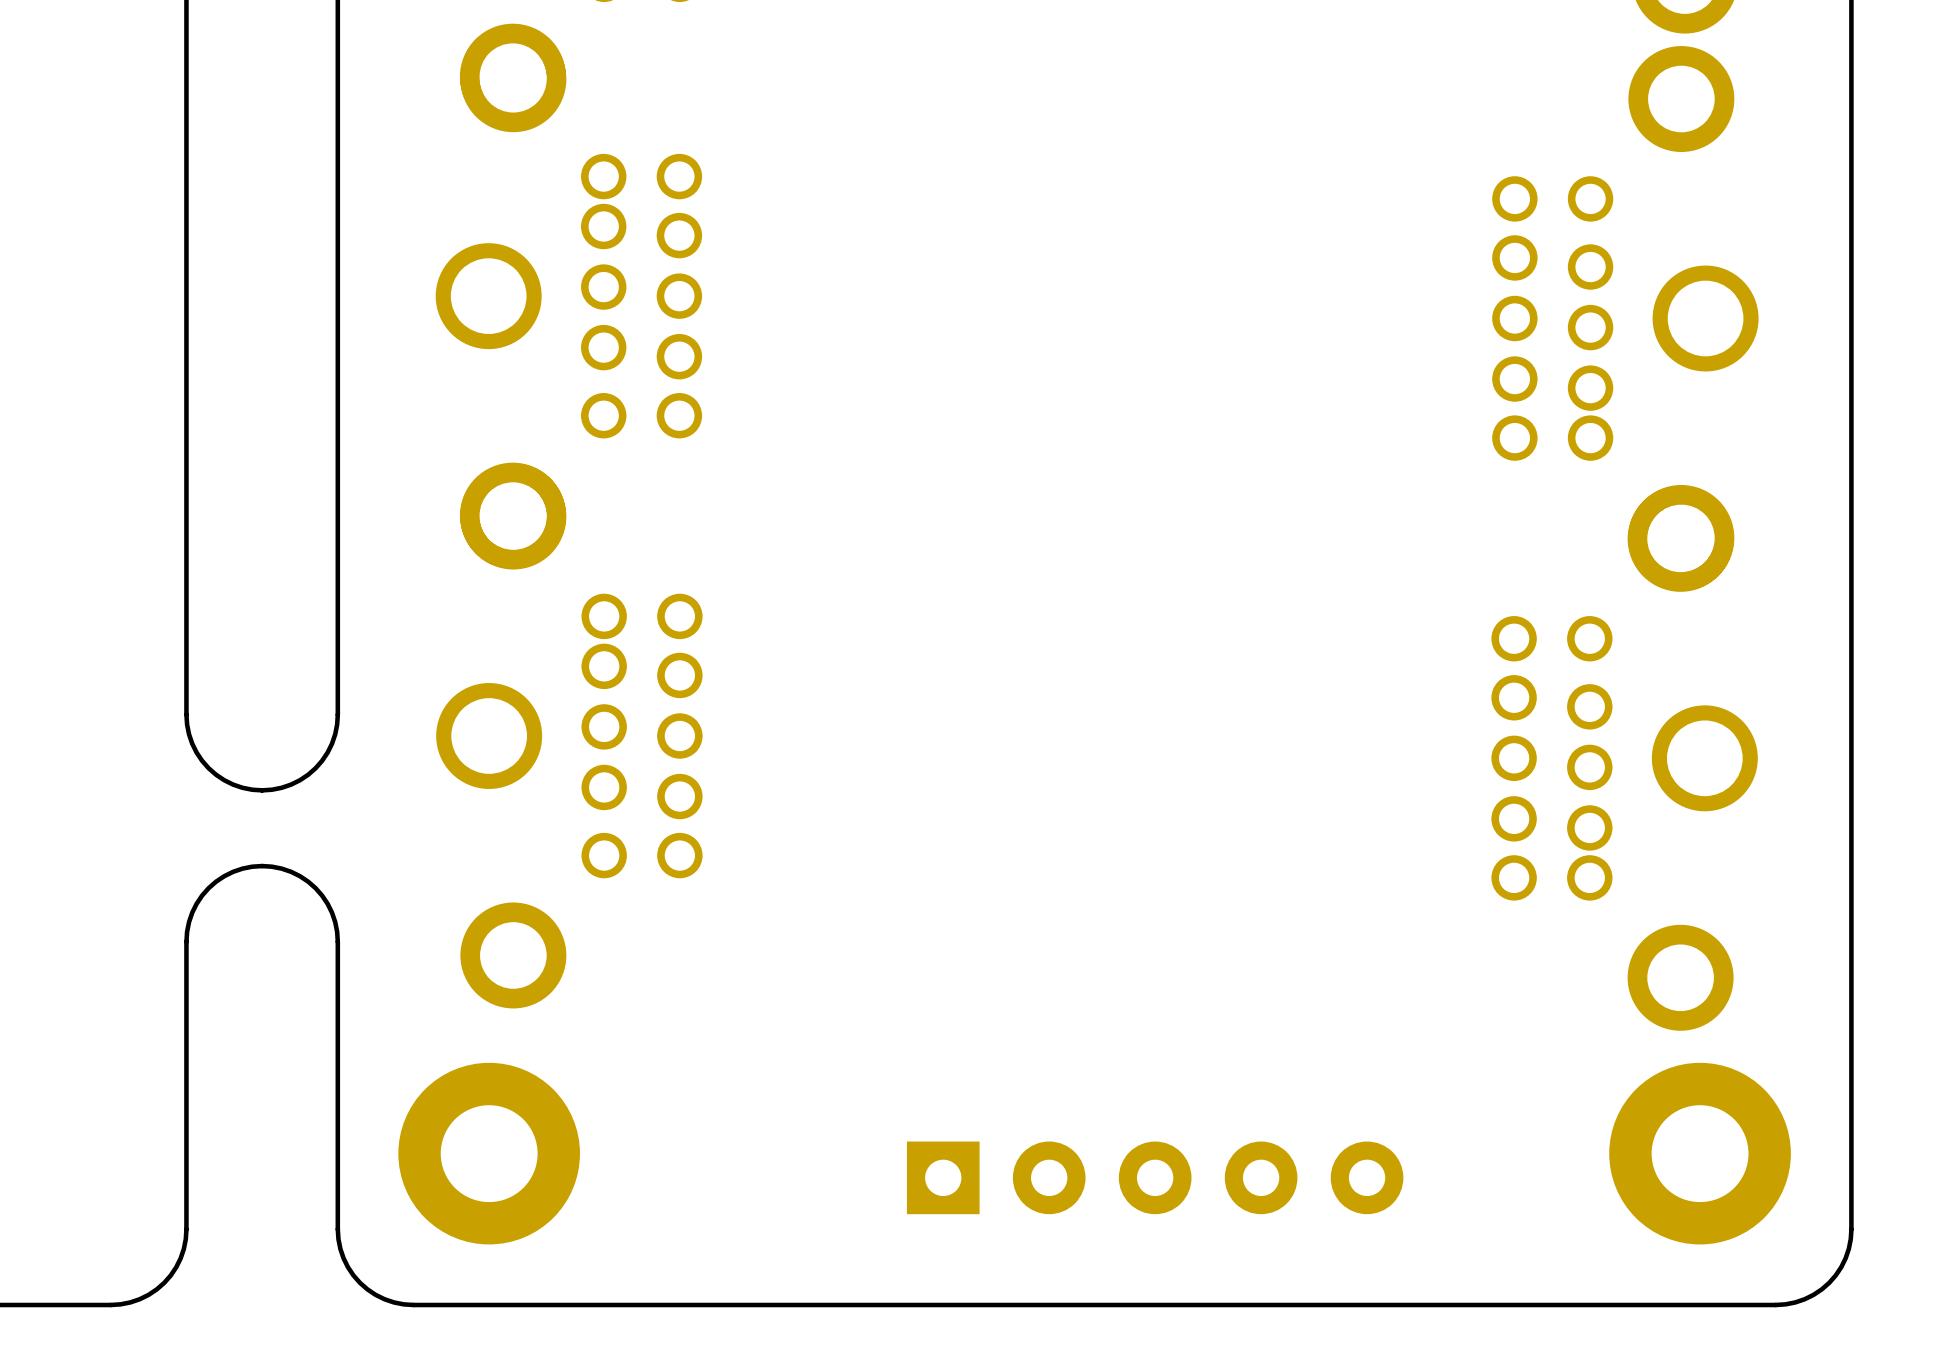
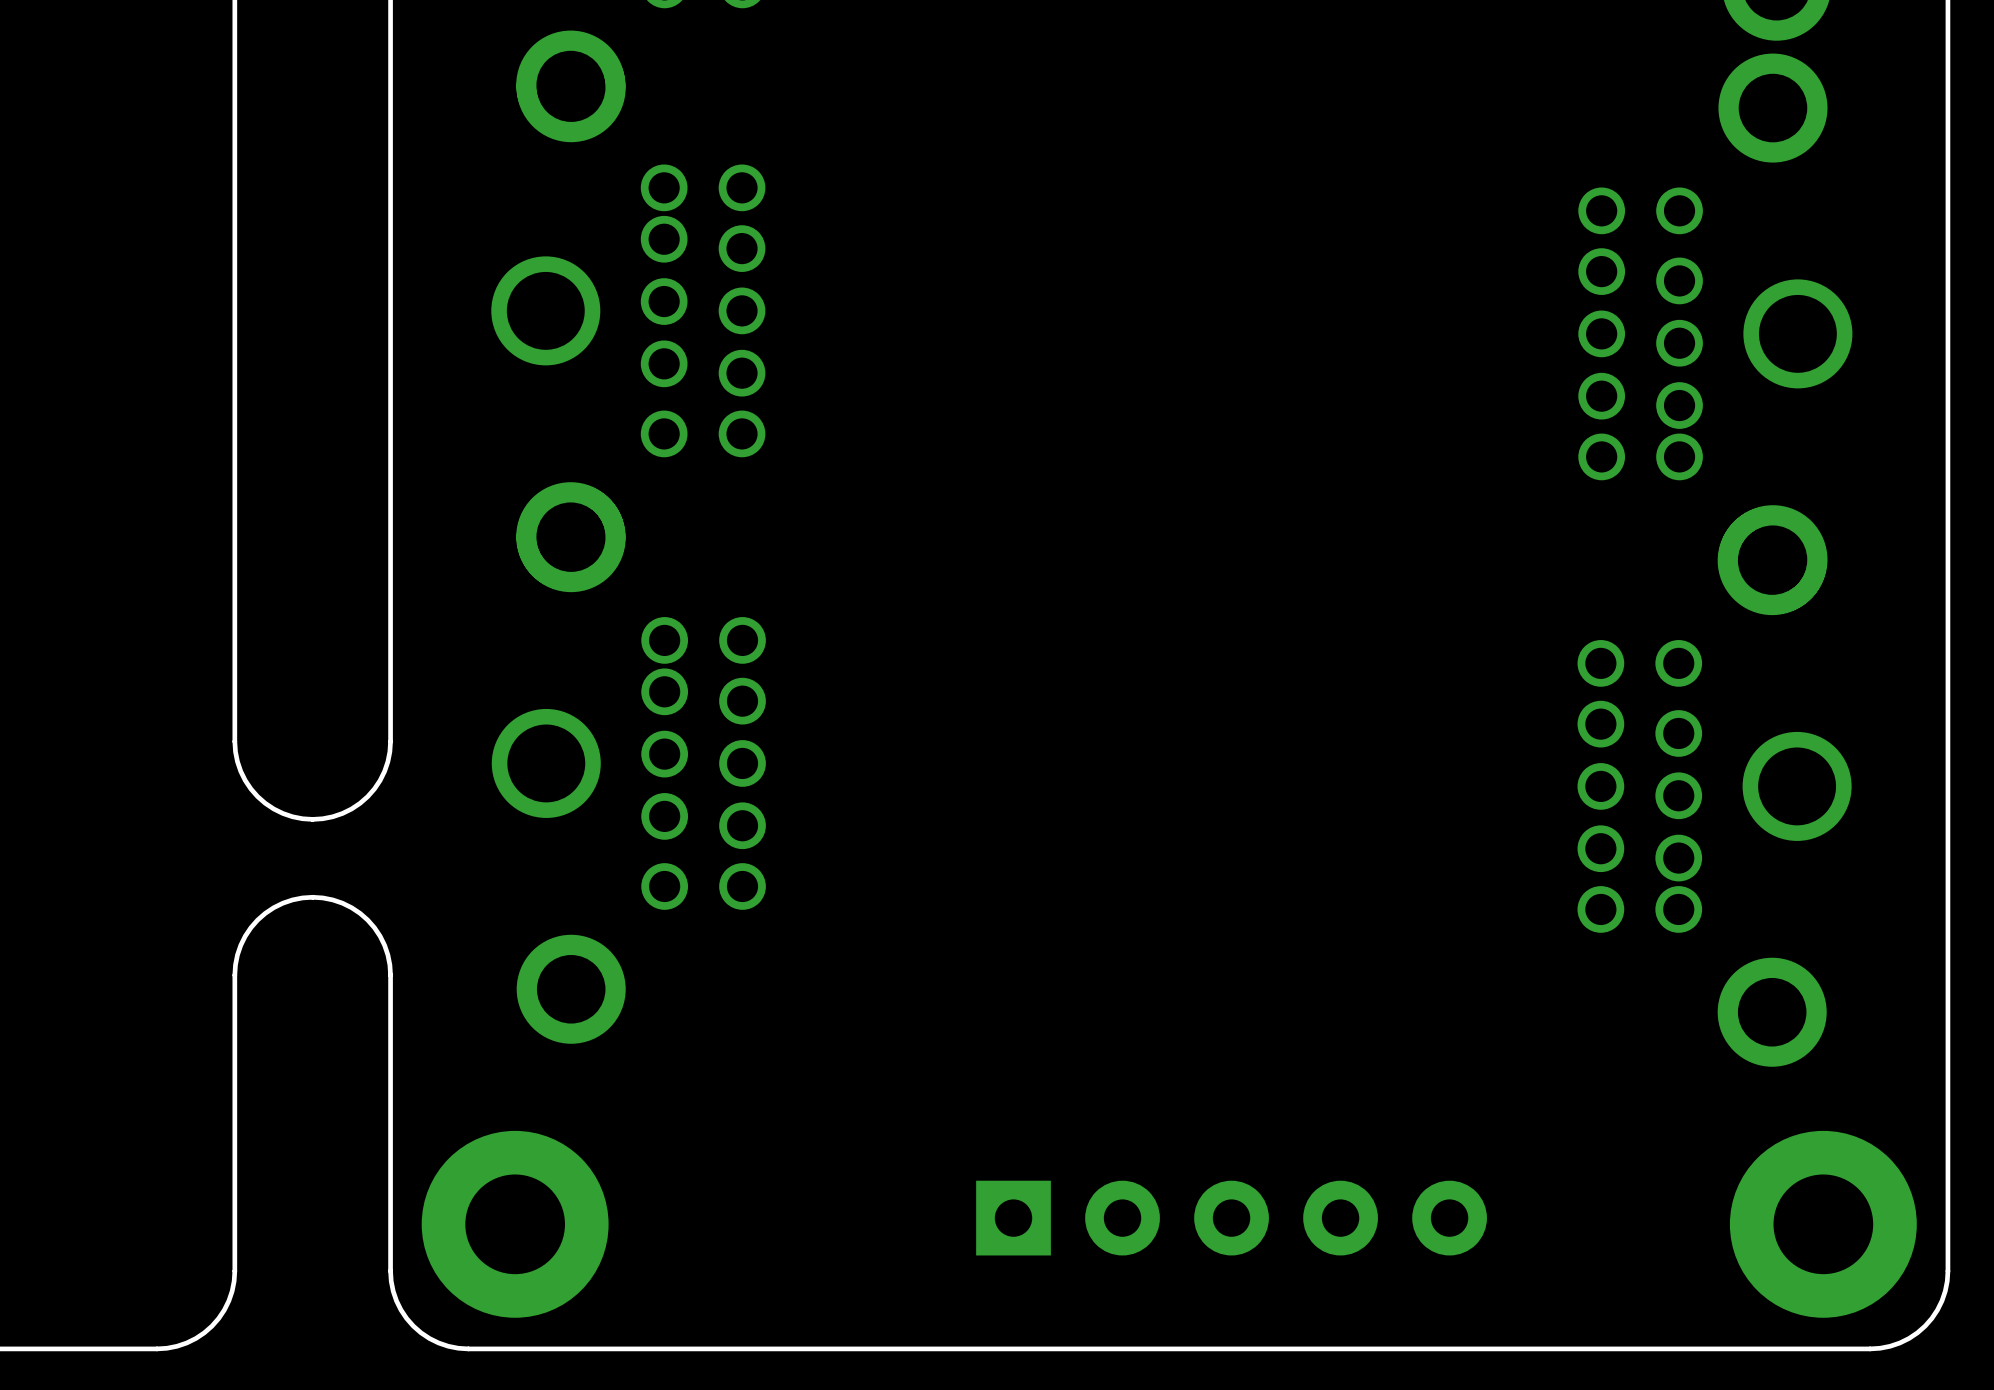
part position: (489, 1153) -> (515, 1224)
part position: (1700, 1153) -> (1823, 1224)

